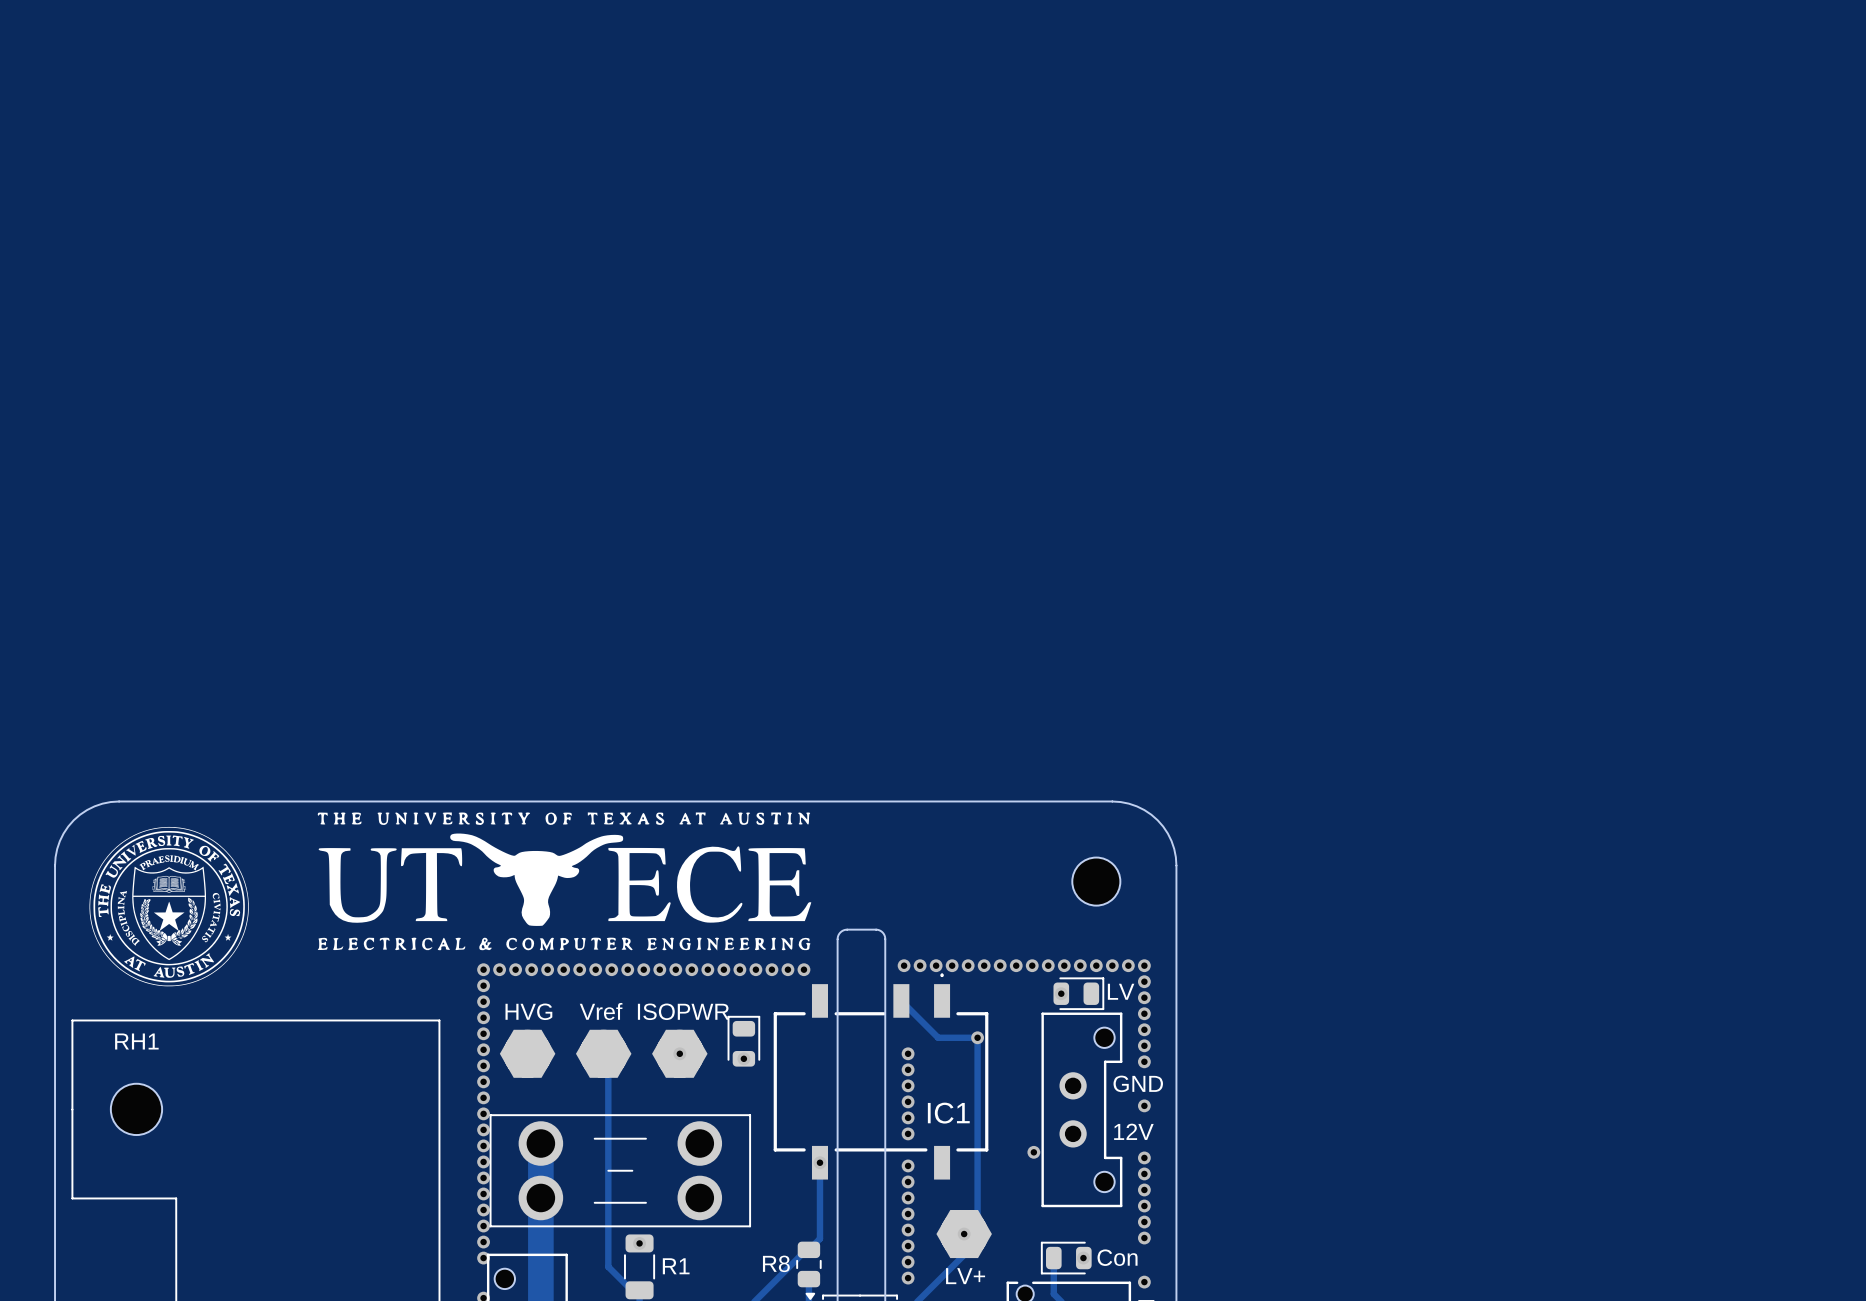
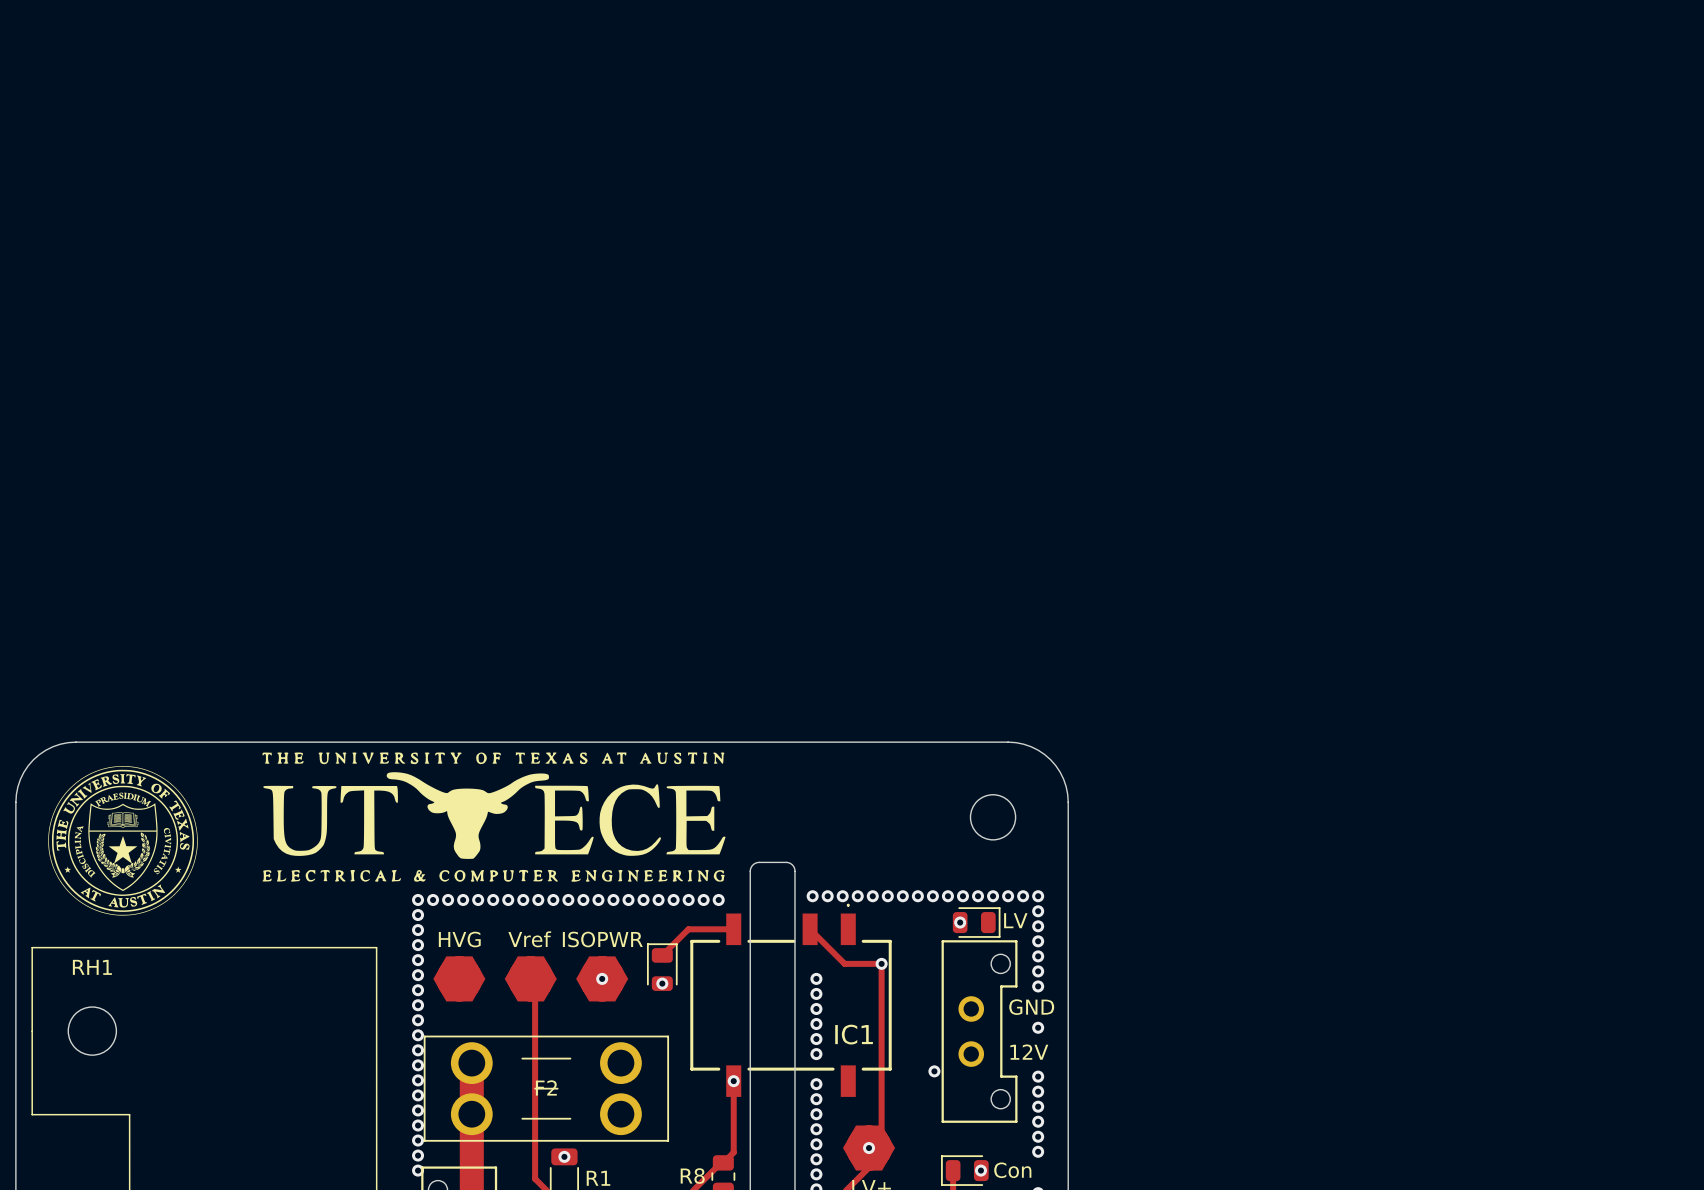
track: none -> (733, 929) (688, 929) (662, 955)
F2 name: none -> F2 (546, 1087)

